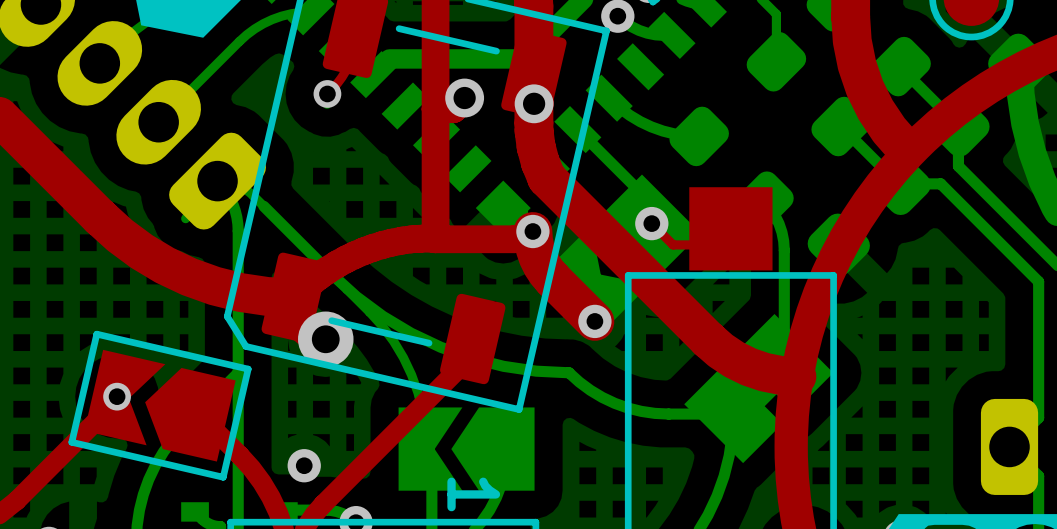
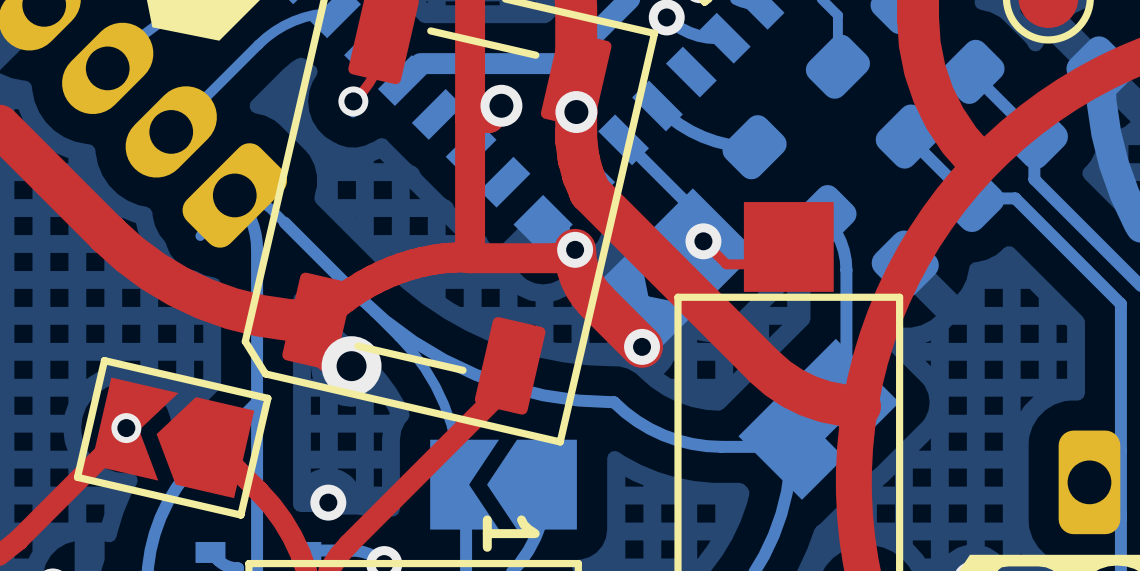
bottom track: none -> (1120, 450) (1120, 513)

